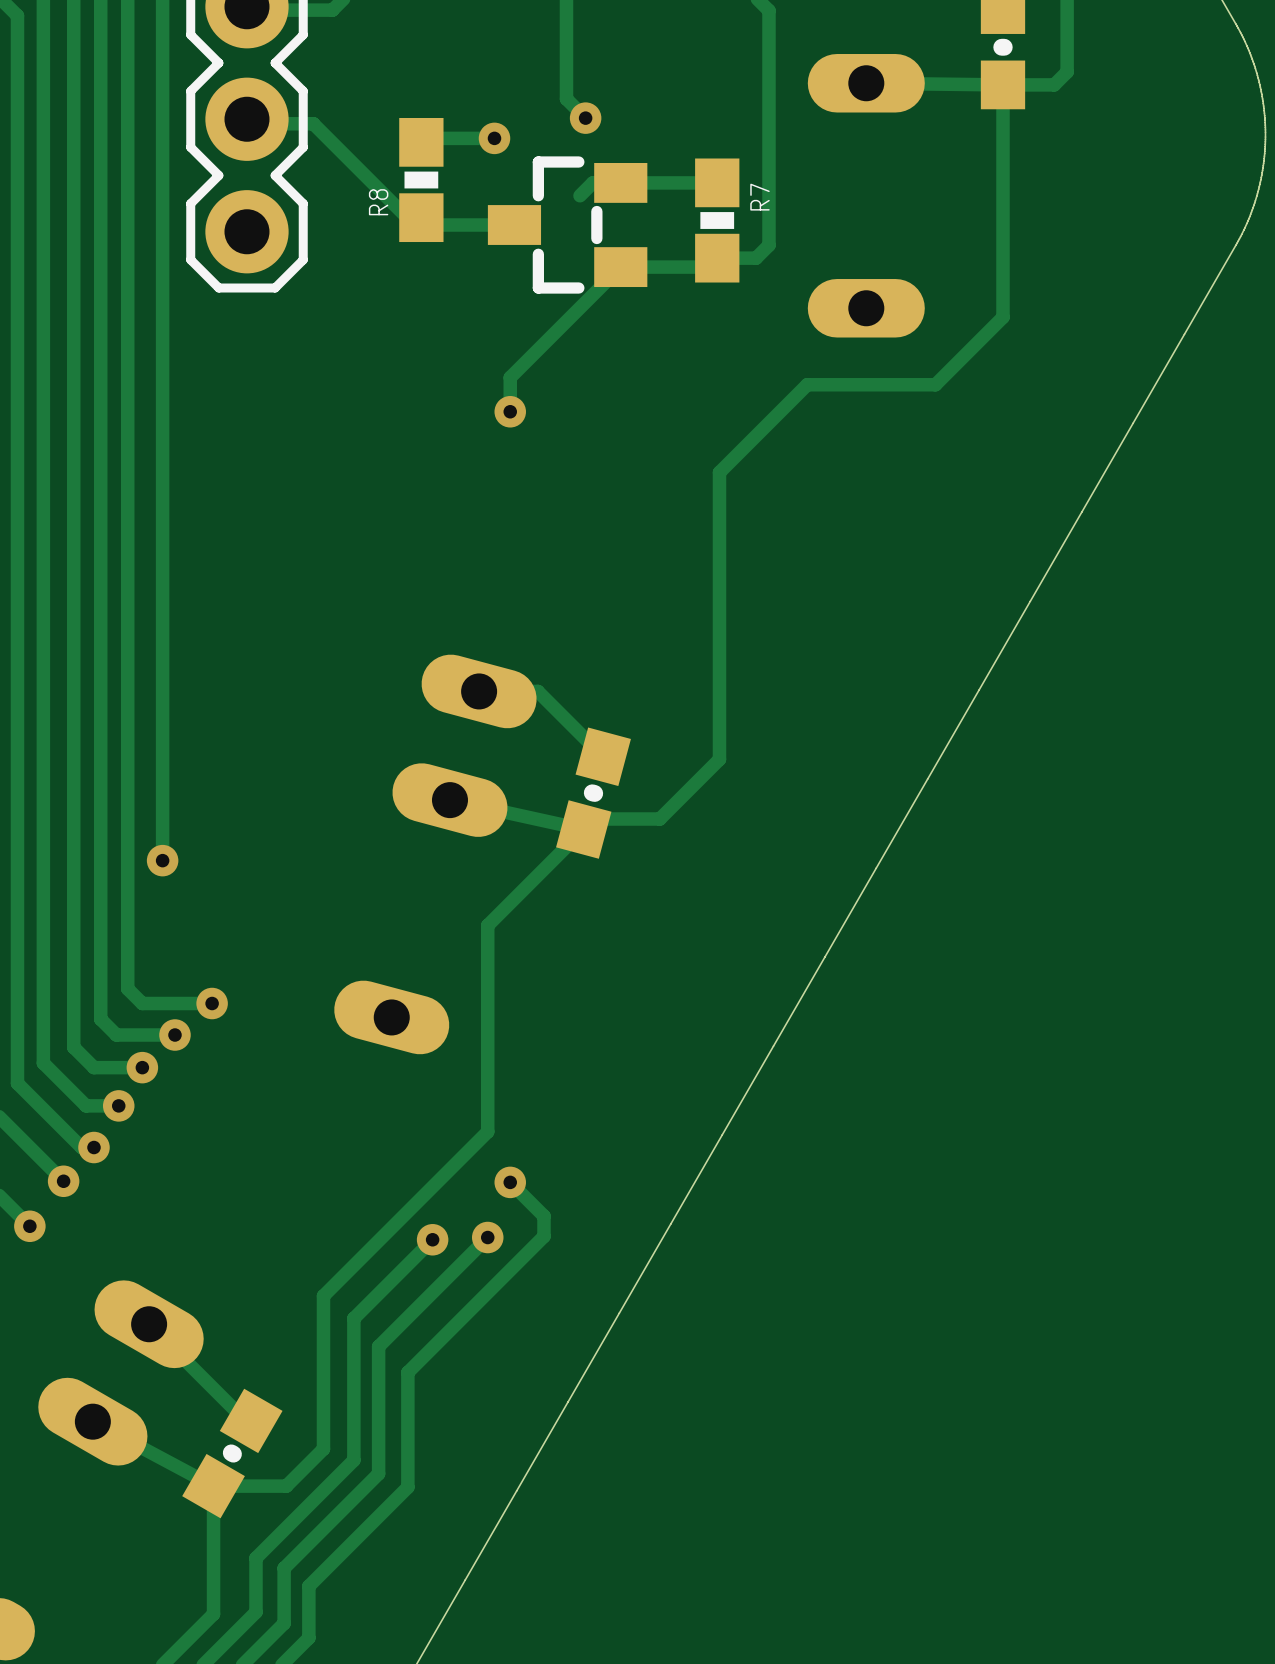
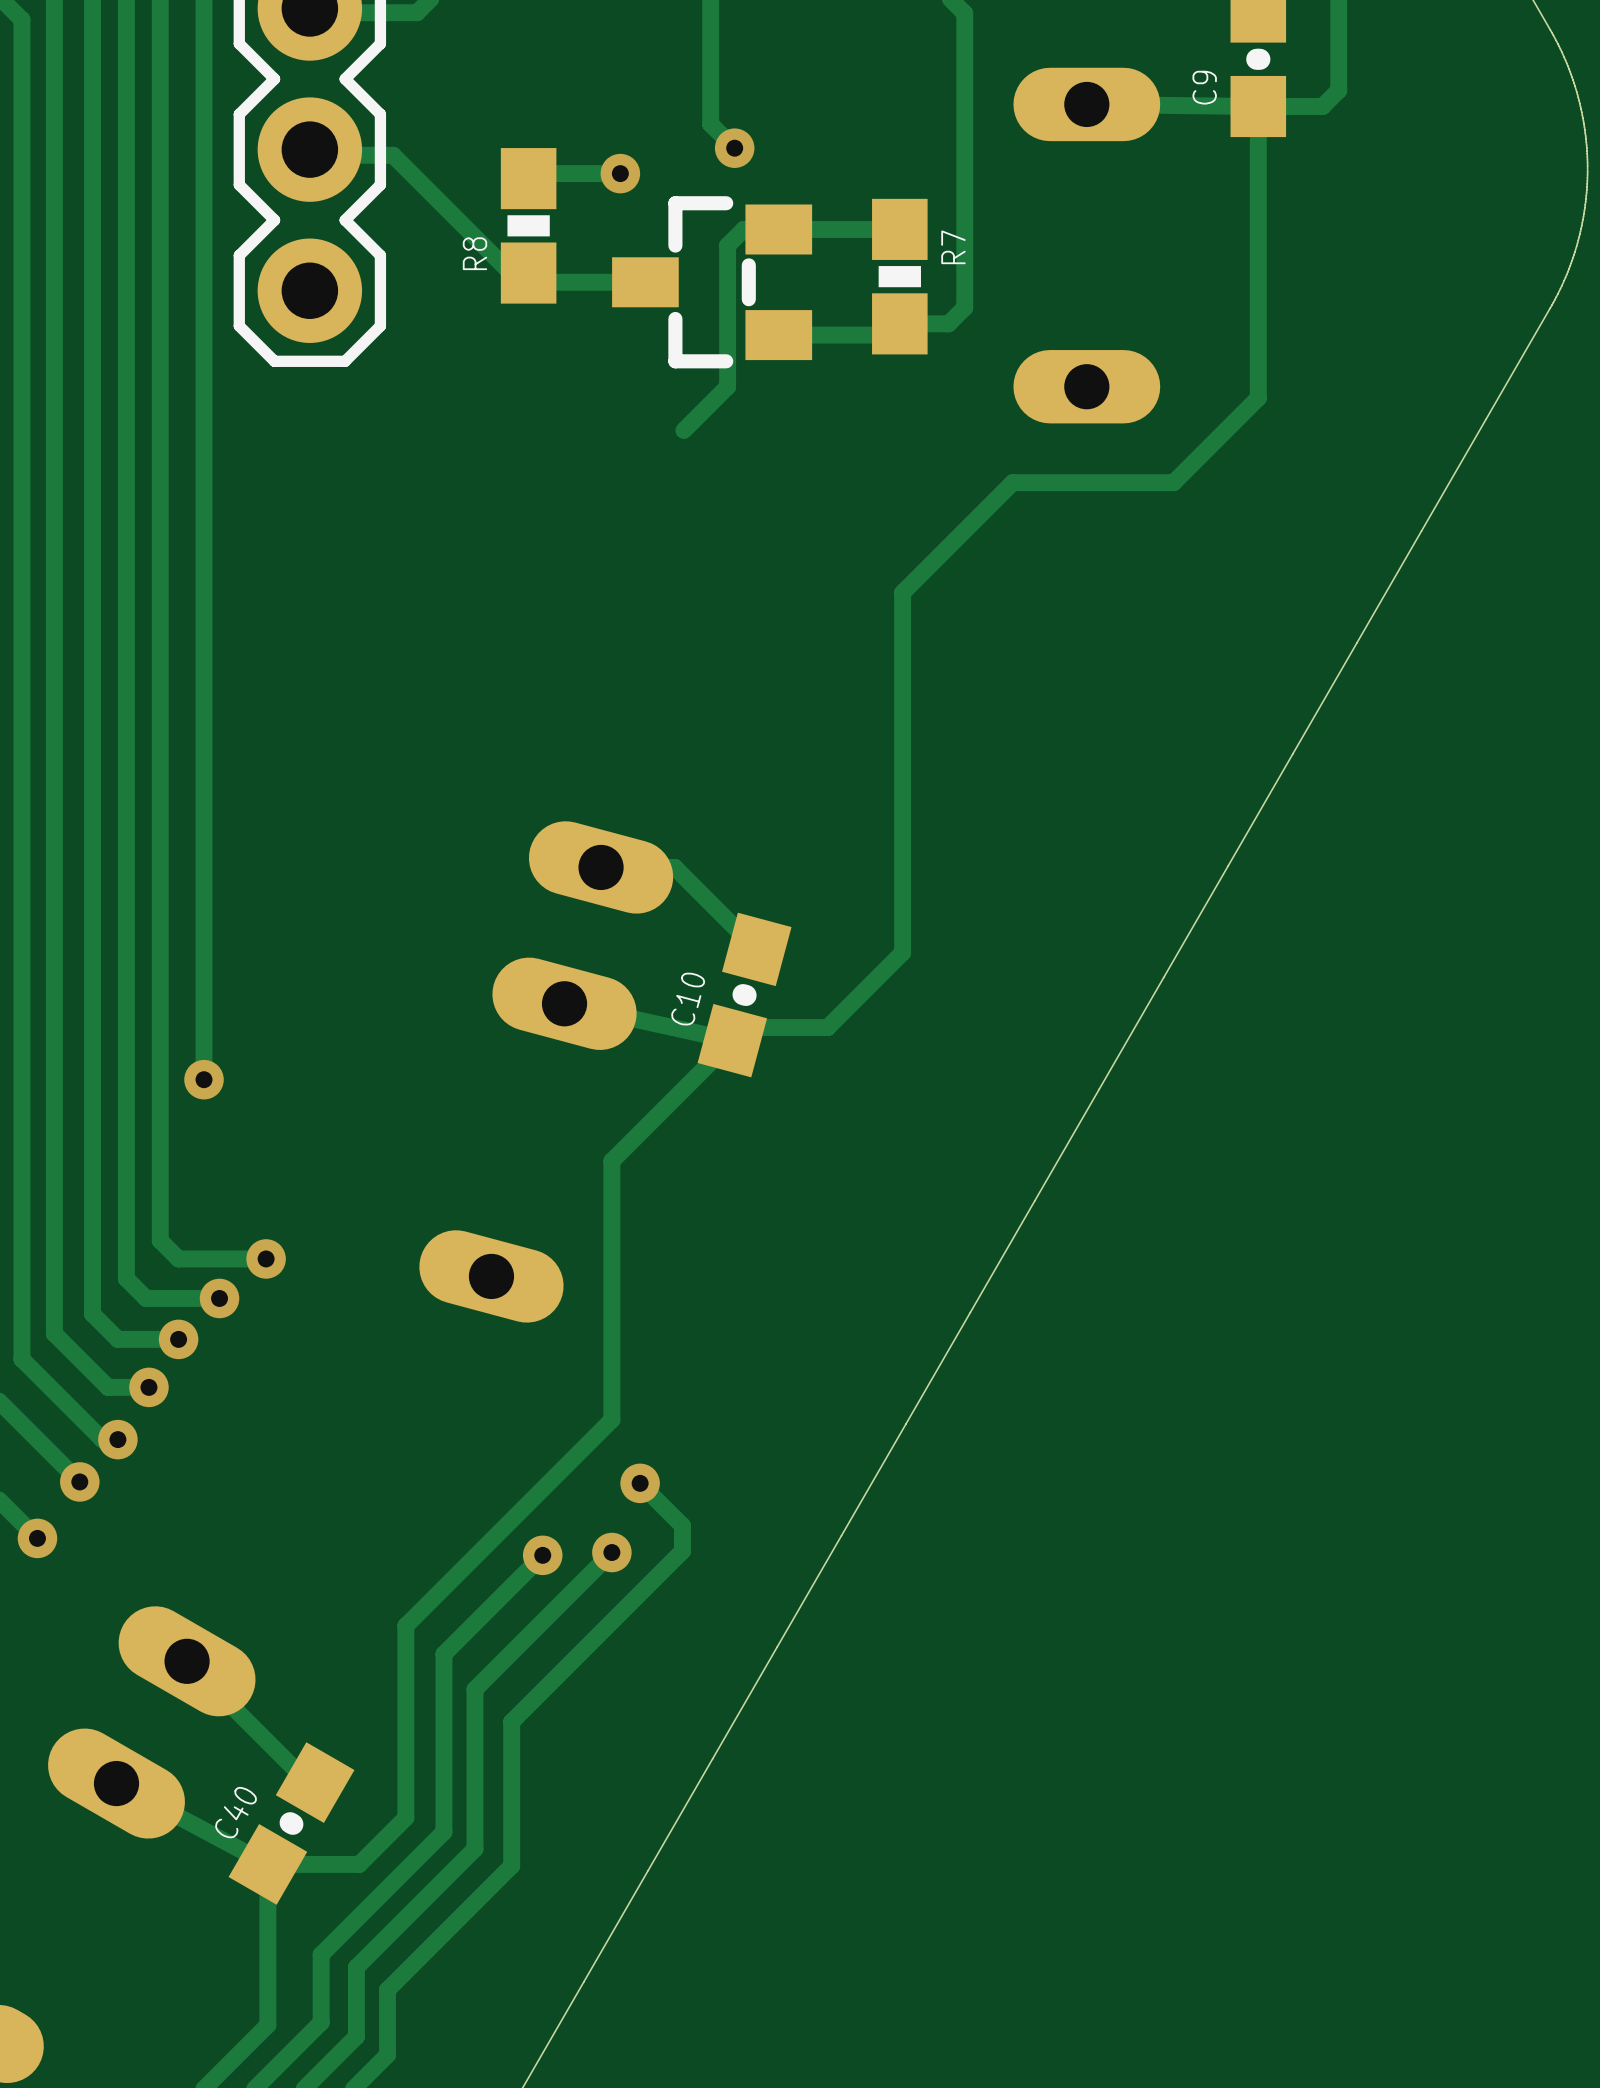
C9 name: none -> C9 (1204, 87)
track: none -> (727, 245) (727, 386) (683, 430)
track: (620, 267) (510, 377) (510, 411) -> none
via: (510, 411) -> none
C10 name: none -> C10 (688, 999)
C40 name: none -> C40 (235, 1812)

